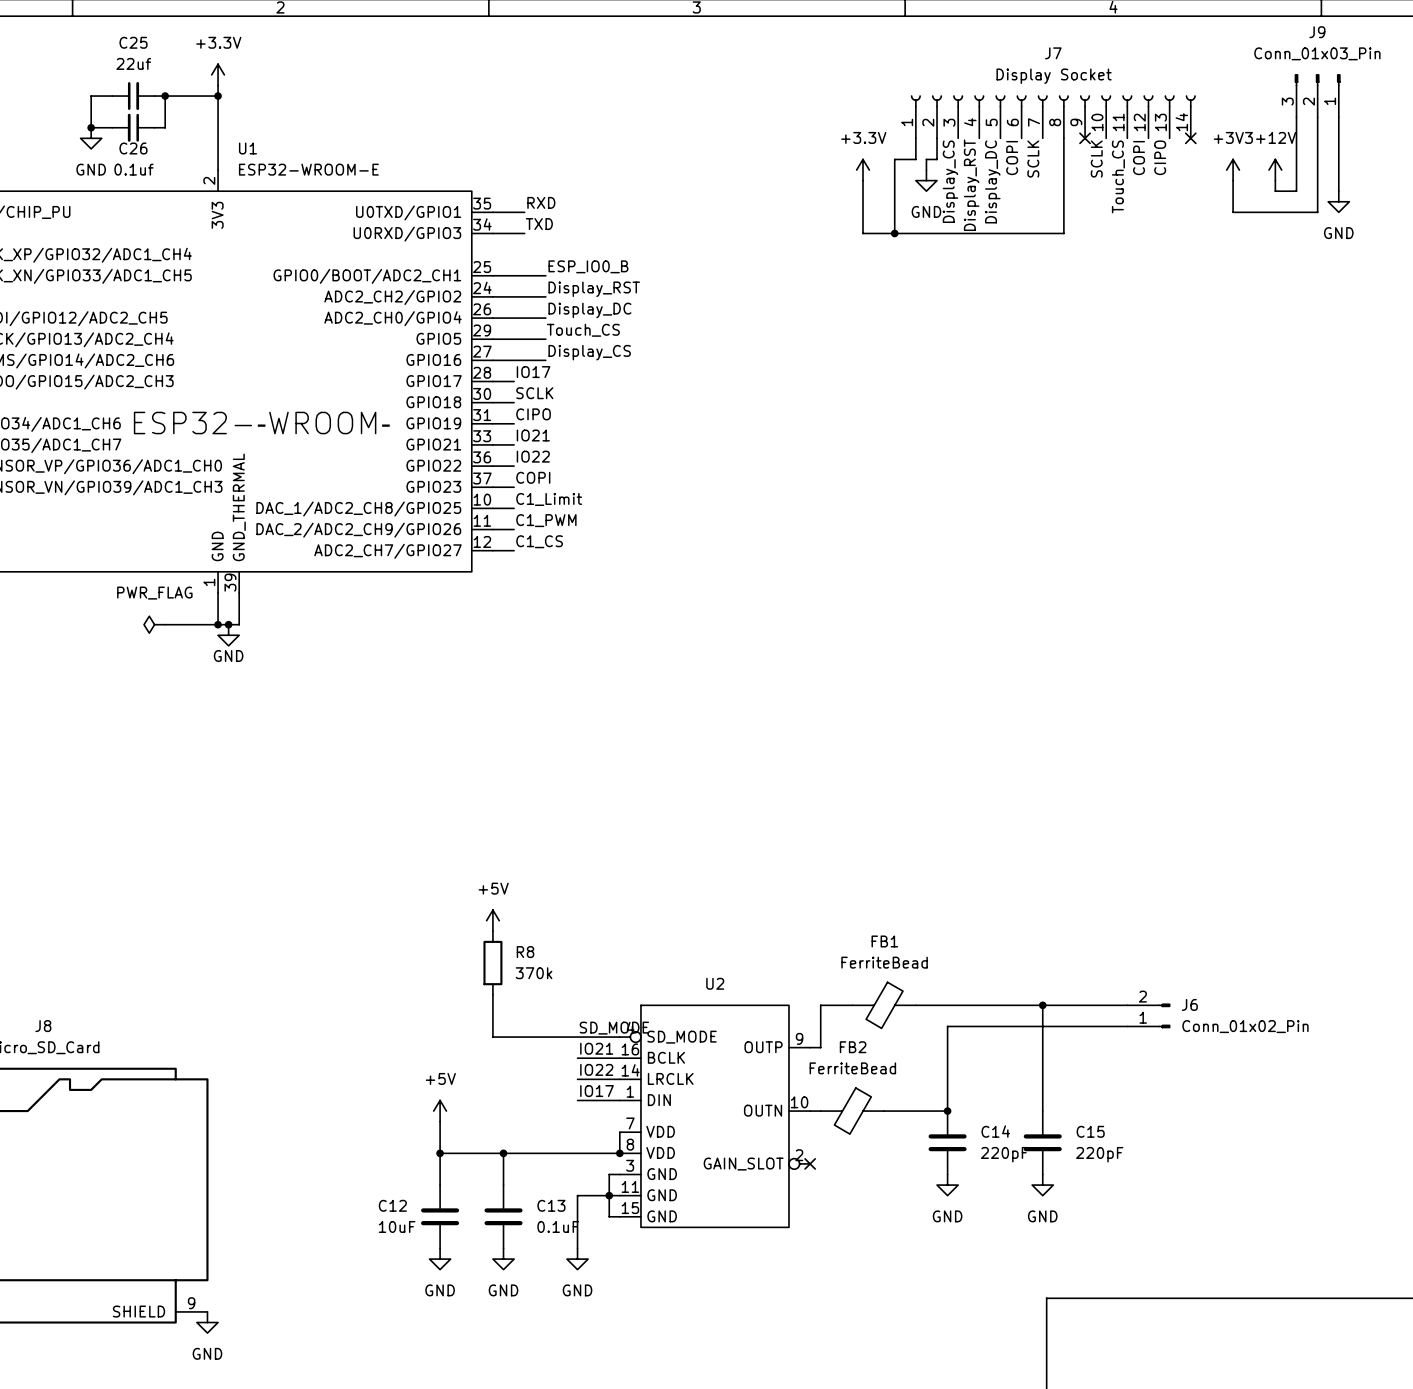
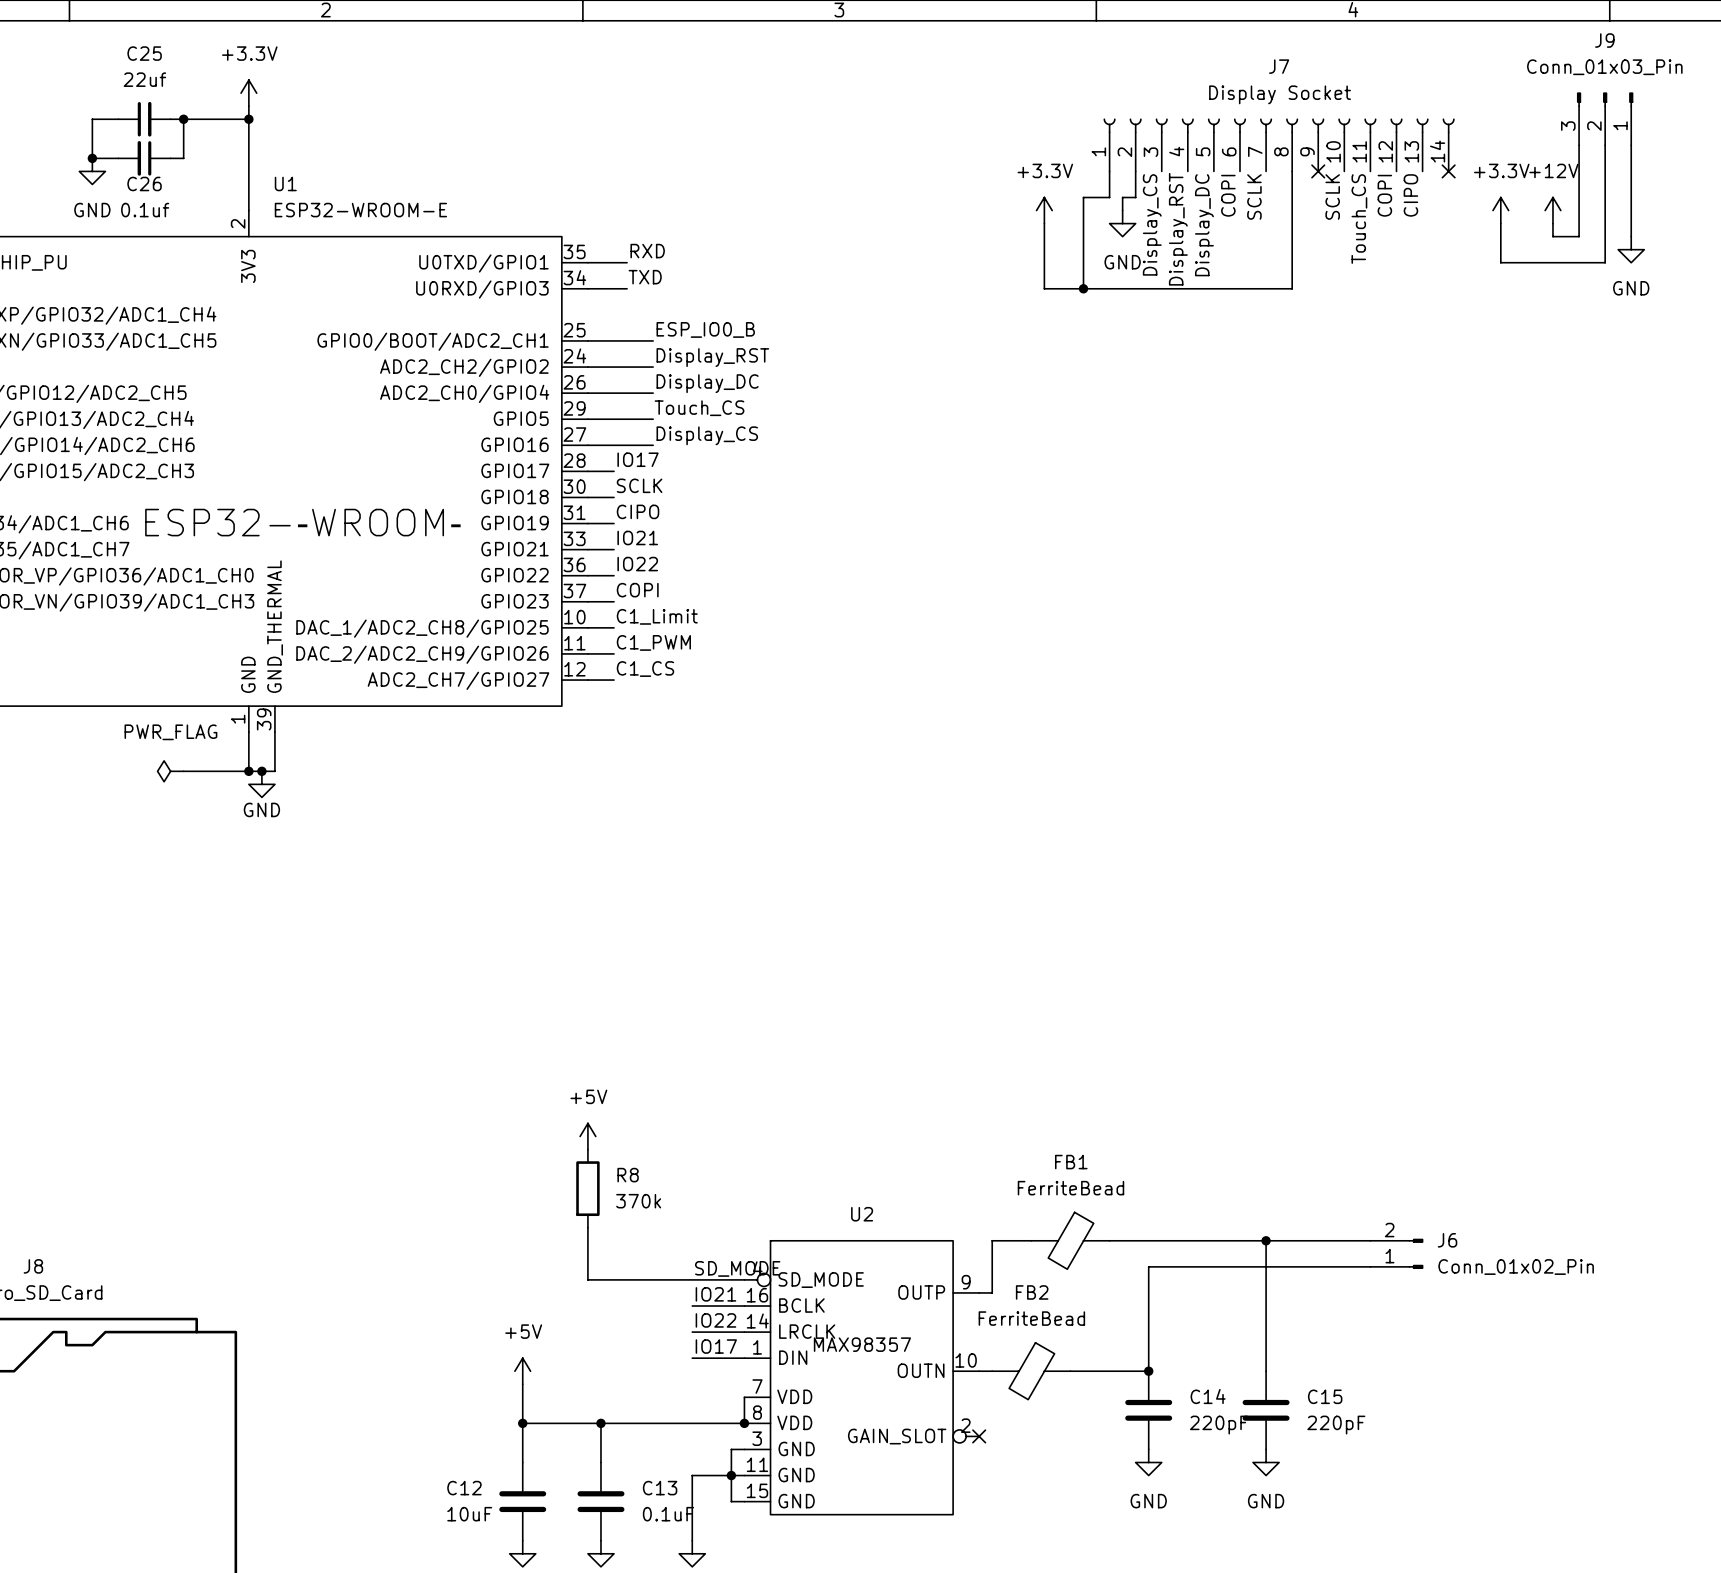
power symbol: +3V3 (1233, 170) -> +3.3V (1500, 210)
U2 value: none -> MAX98357 (862, 1344)

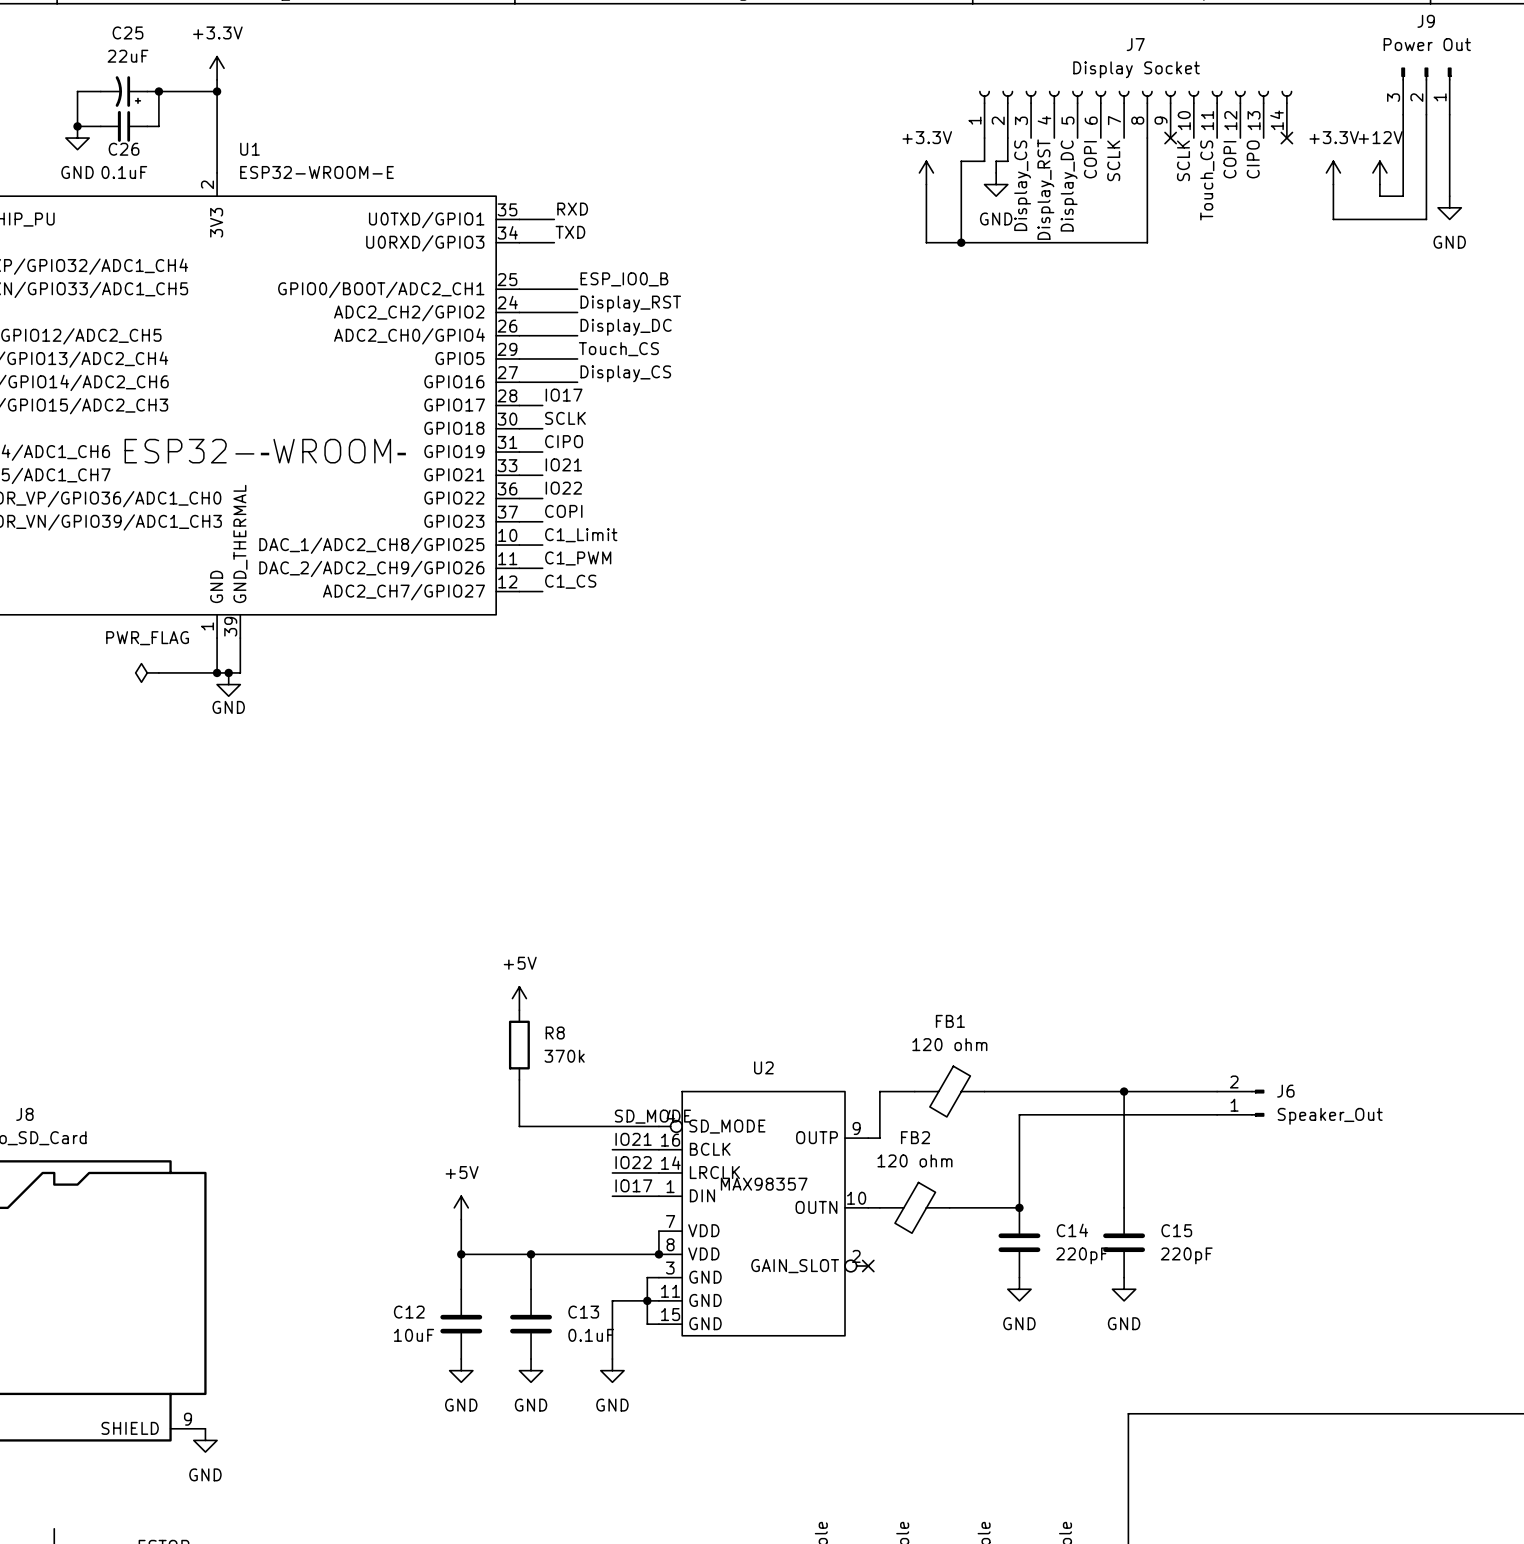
J9 value: Conn_01x03_Pin (1604, 67) -> Power Out (1427, 44)
C25 value: 22uf (144, 79) -> 22uF (127, 56)
C25 symbol: [118, 101, 171, 137] -> [100, 76, 148, 107]
C26 value: 0.1uf (145, 210) -> 0.1uF (124, 172)
FB1 value: FerriteBead (1070, 1188) -> 120 ohm (949, 1044)
J6 value: Conn_01x02_Pin (1516, 1267) -> Speaker_Out (1330, 1116)
FB2 value: FerriteBead (1031, 1318) -> 120 ohm (914, 1160)

